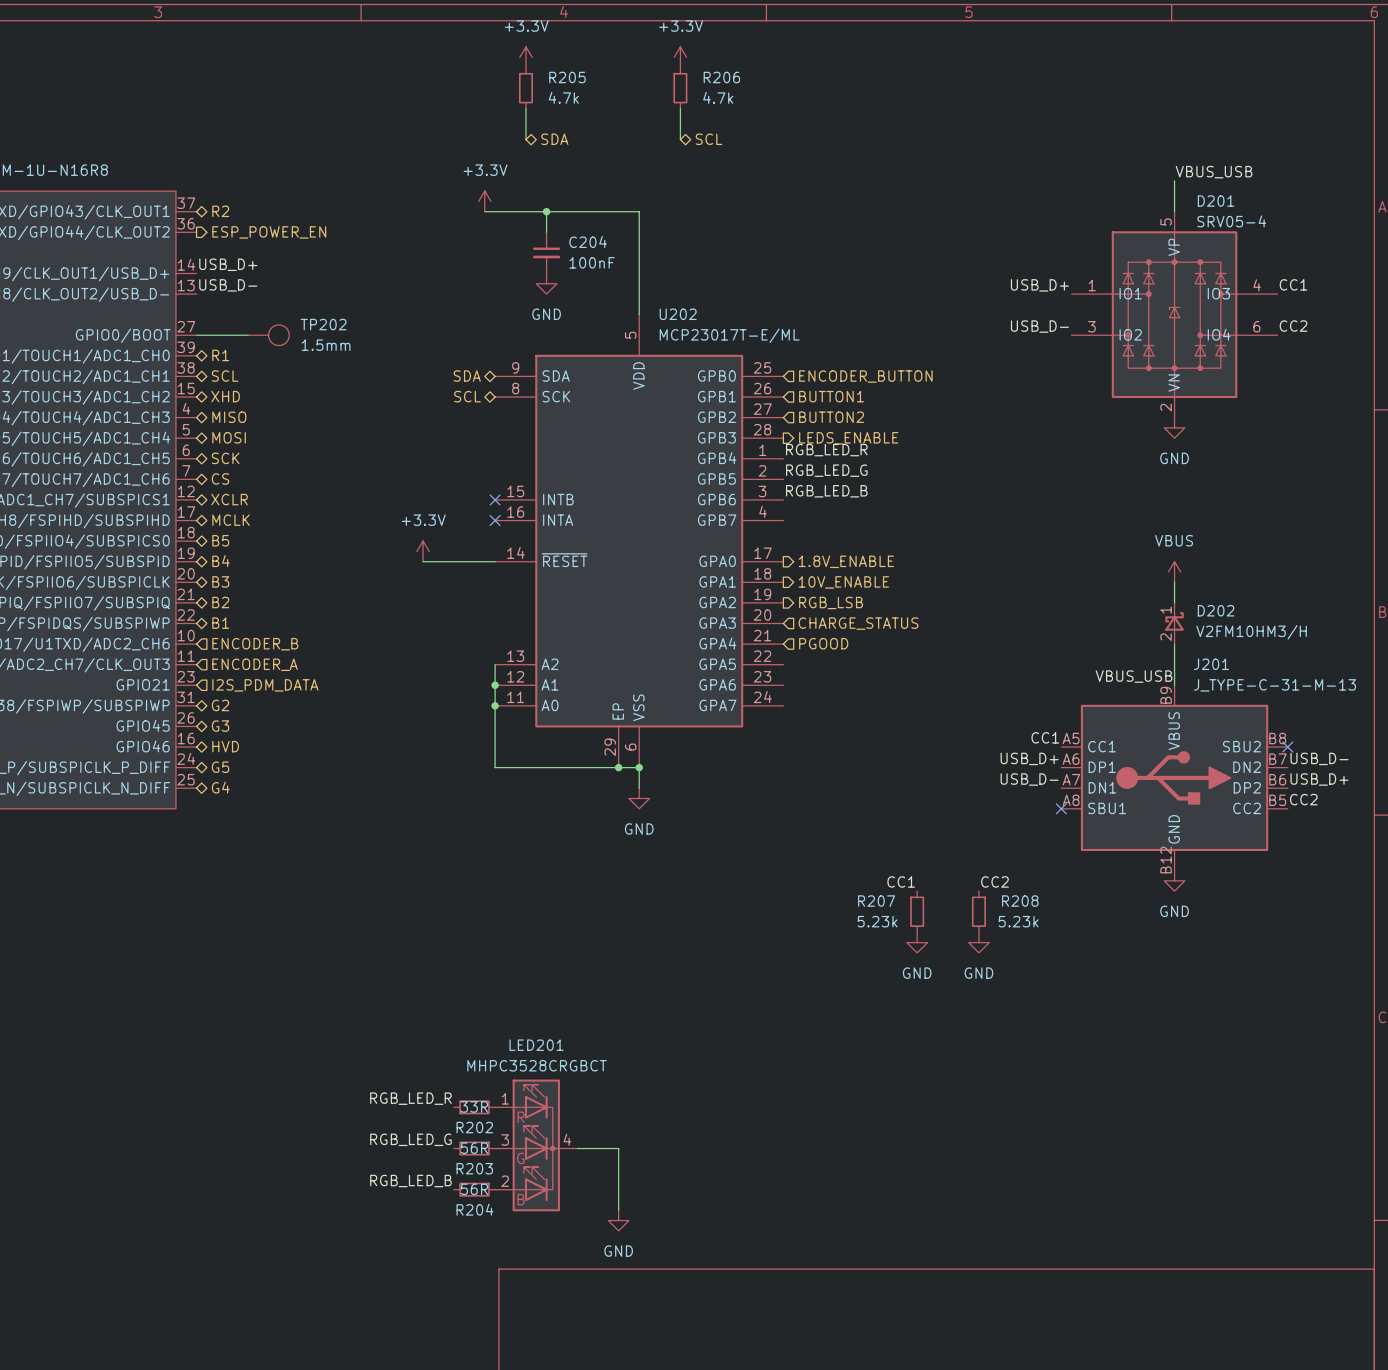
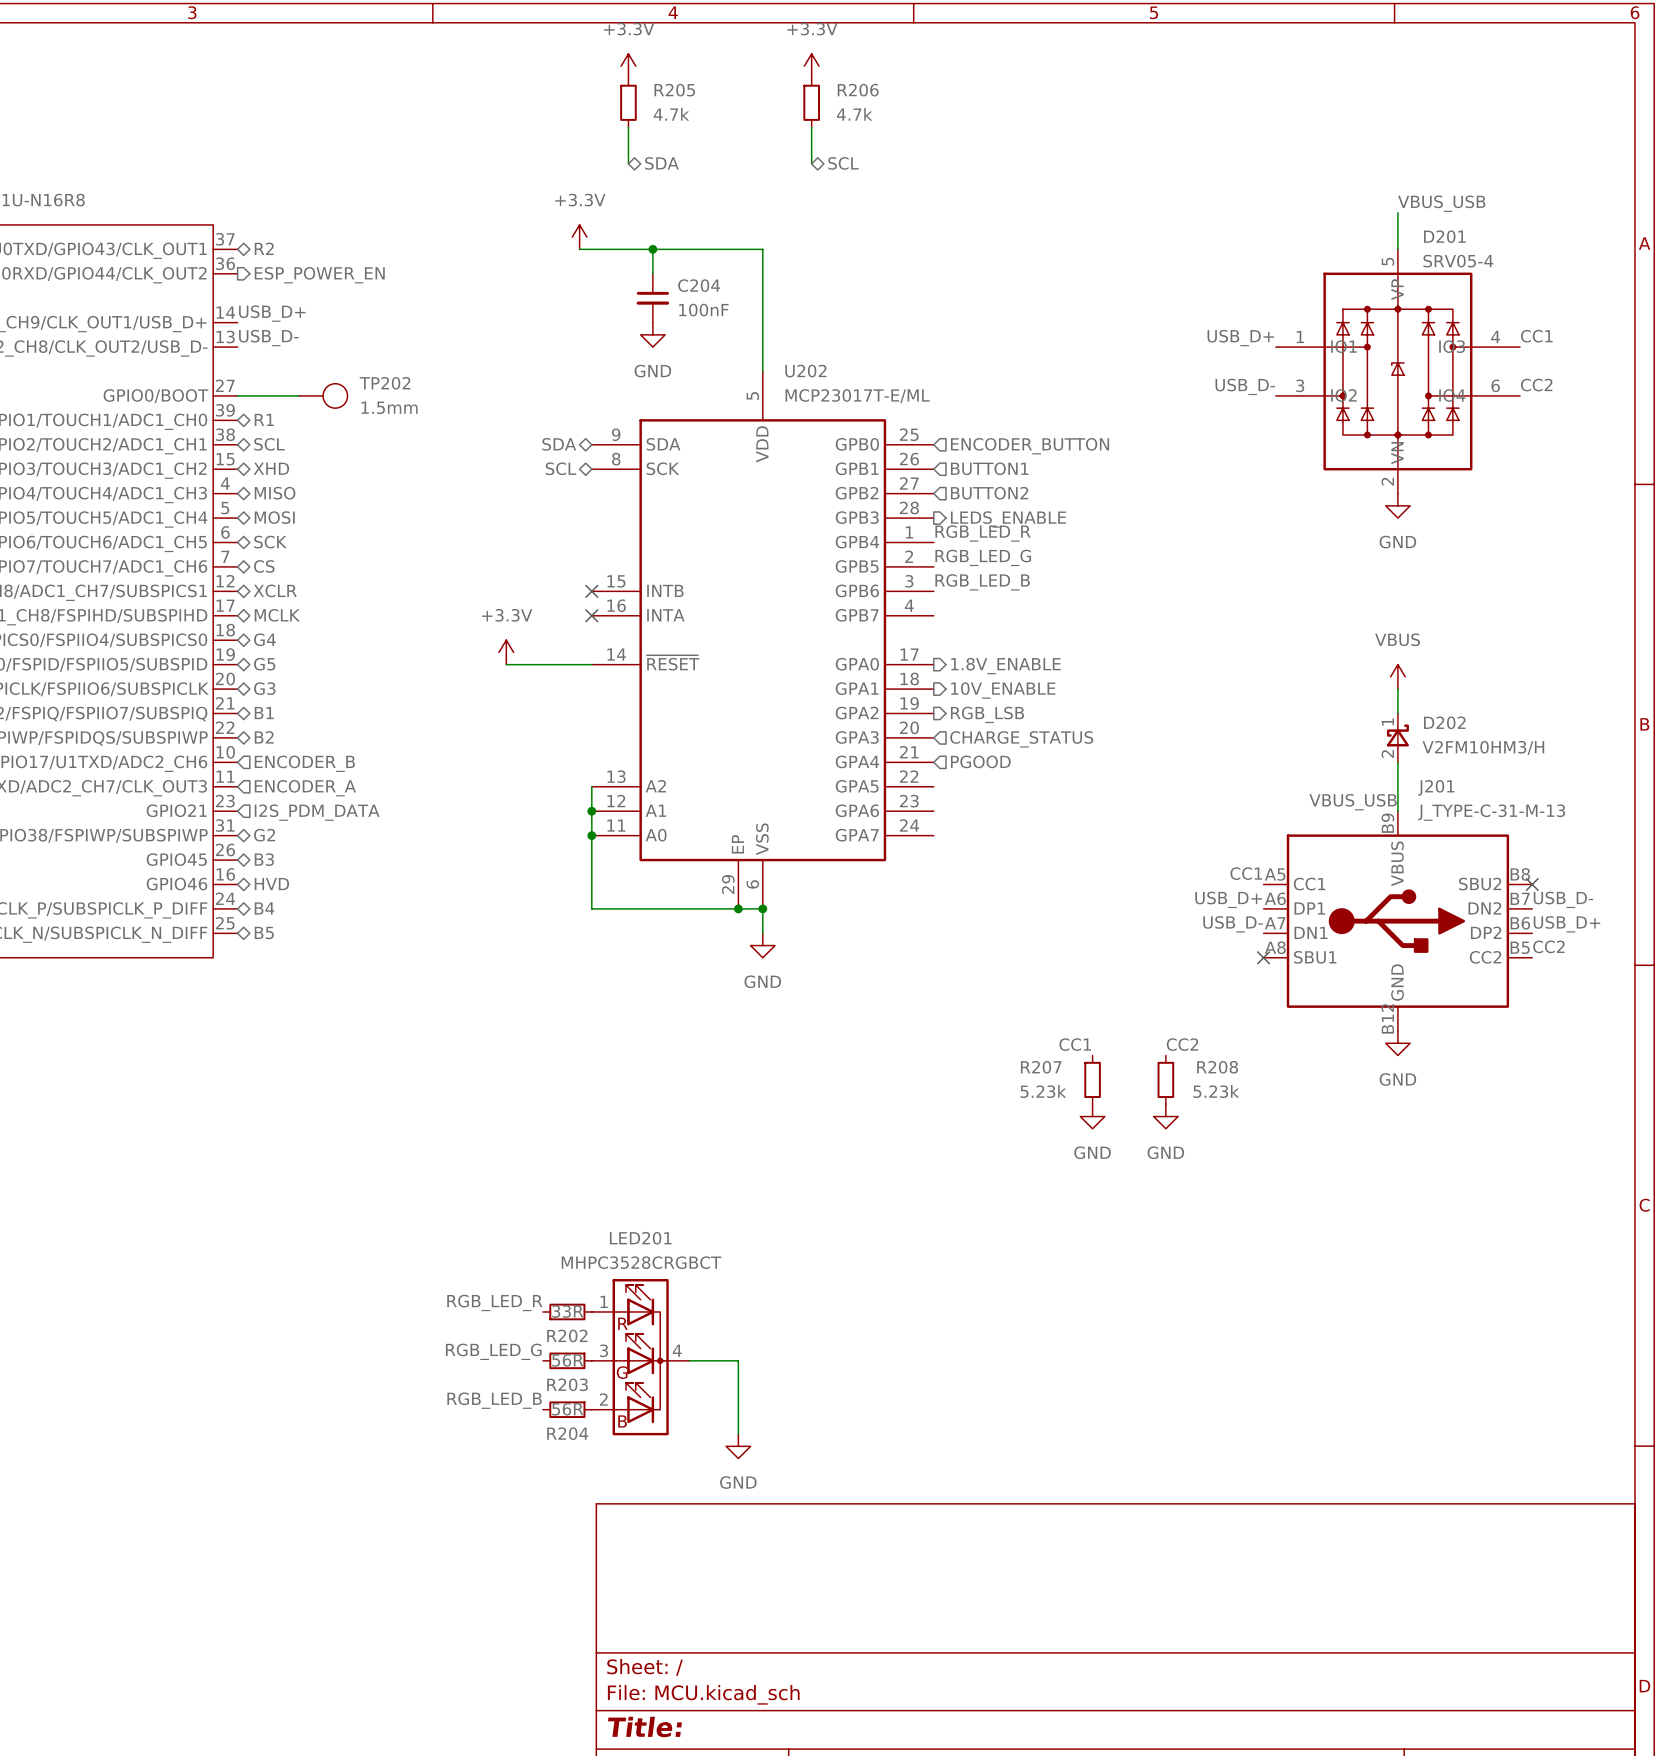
hierarchical label: B5 (220, 540) -> G4 (264, 639)
hierarchical label: B4 (220, 561) -> G5 (264, 664)
hierarchical label: B3 (220, 581) -> G3 (264, 688)
hierarchical label: B2 (220, 602) -> B1 (264, 713)
hierarchical label: B1 (220, 623) -> B2 (264, 737)
hierarchical label: G3 (220, 726) -> B3 (264, 859)
hierarchical label: G5 (220, 767) -> B4 (264, 908)
hierarchical label: G4 (220, 787) -> B5 (264, 933)

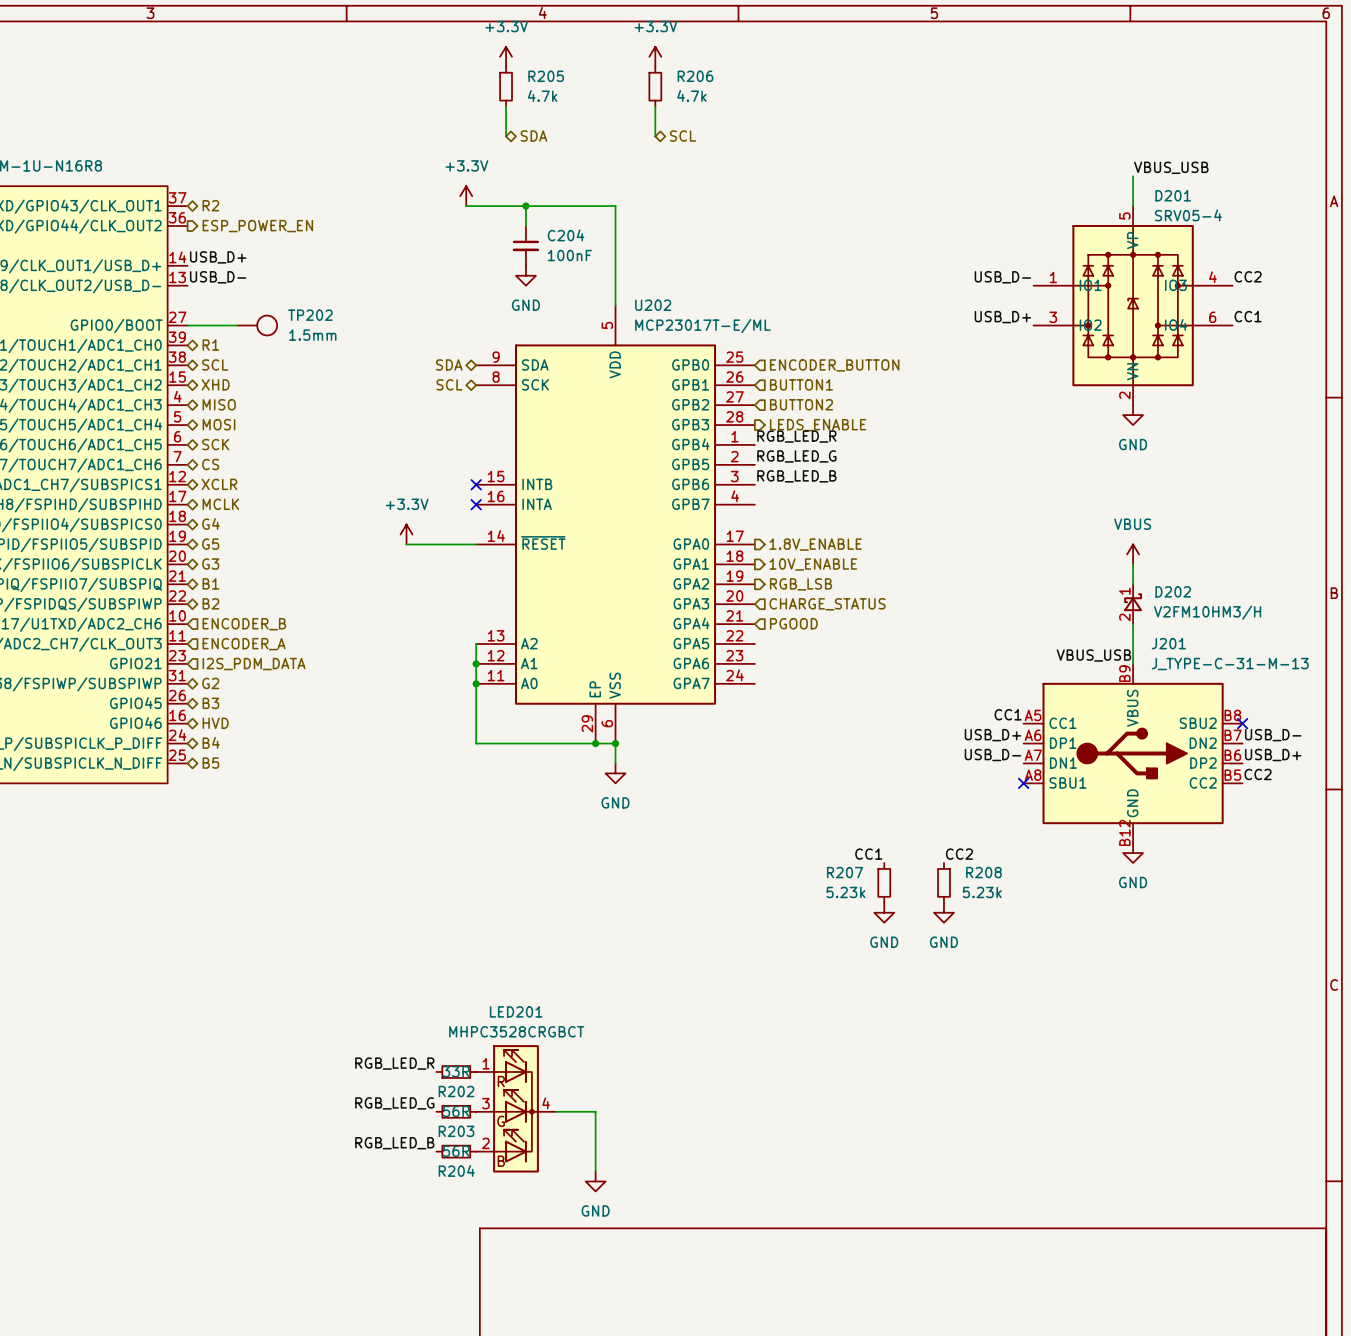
label: CC1 (1536, 336) -> CC2 (1248, 276)
label: USB_D+ (1240, 338) -> USB_D- (1002, 277)
label: CC2 (1536, 385) -> CC1 (1248, 316)
label: USB_D- (1245, 386) -> USB_D+ (1002, 317)

